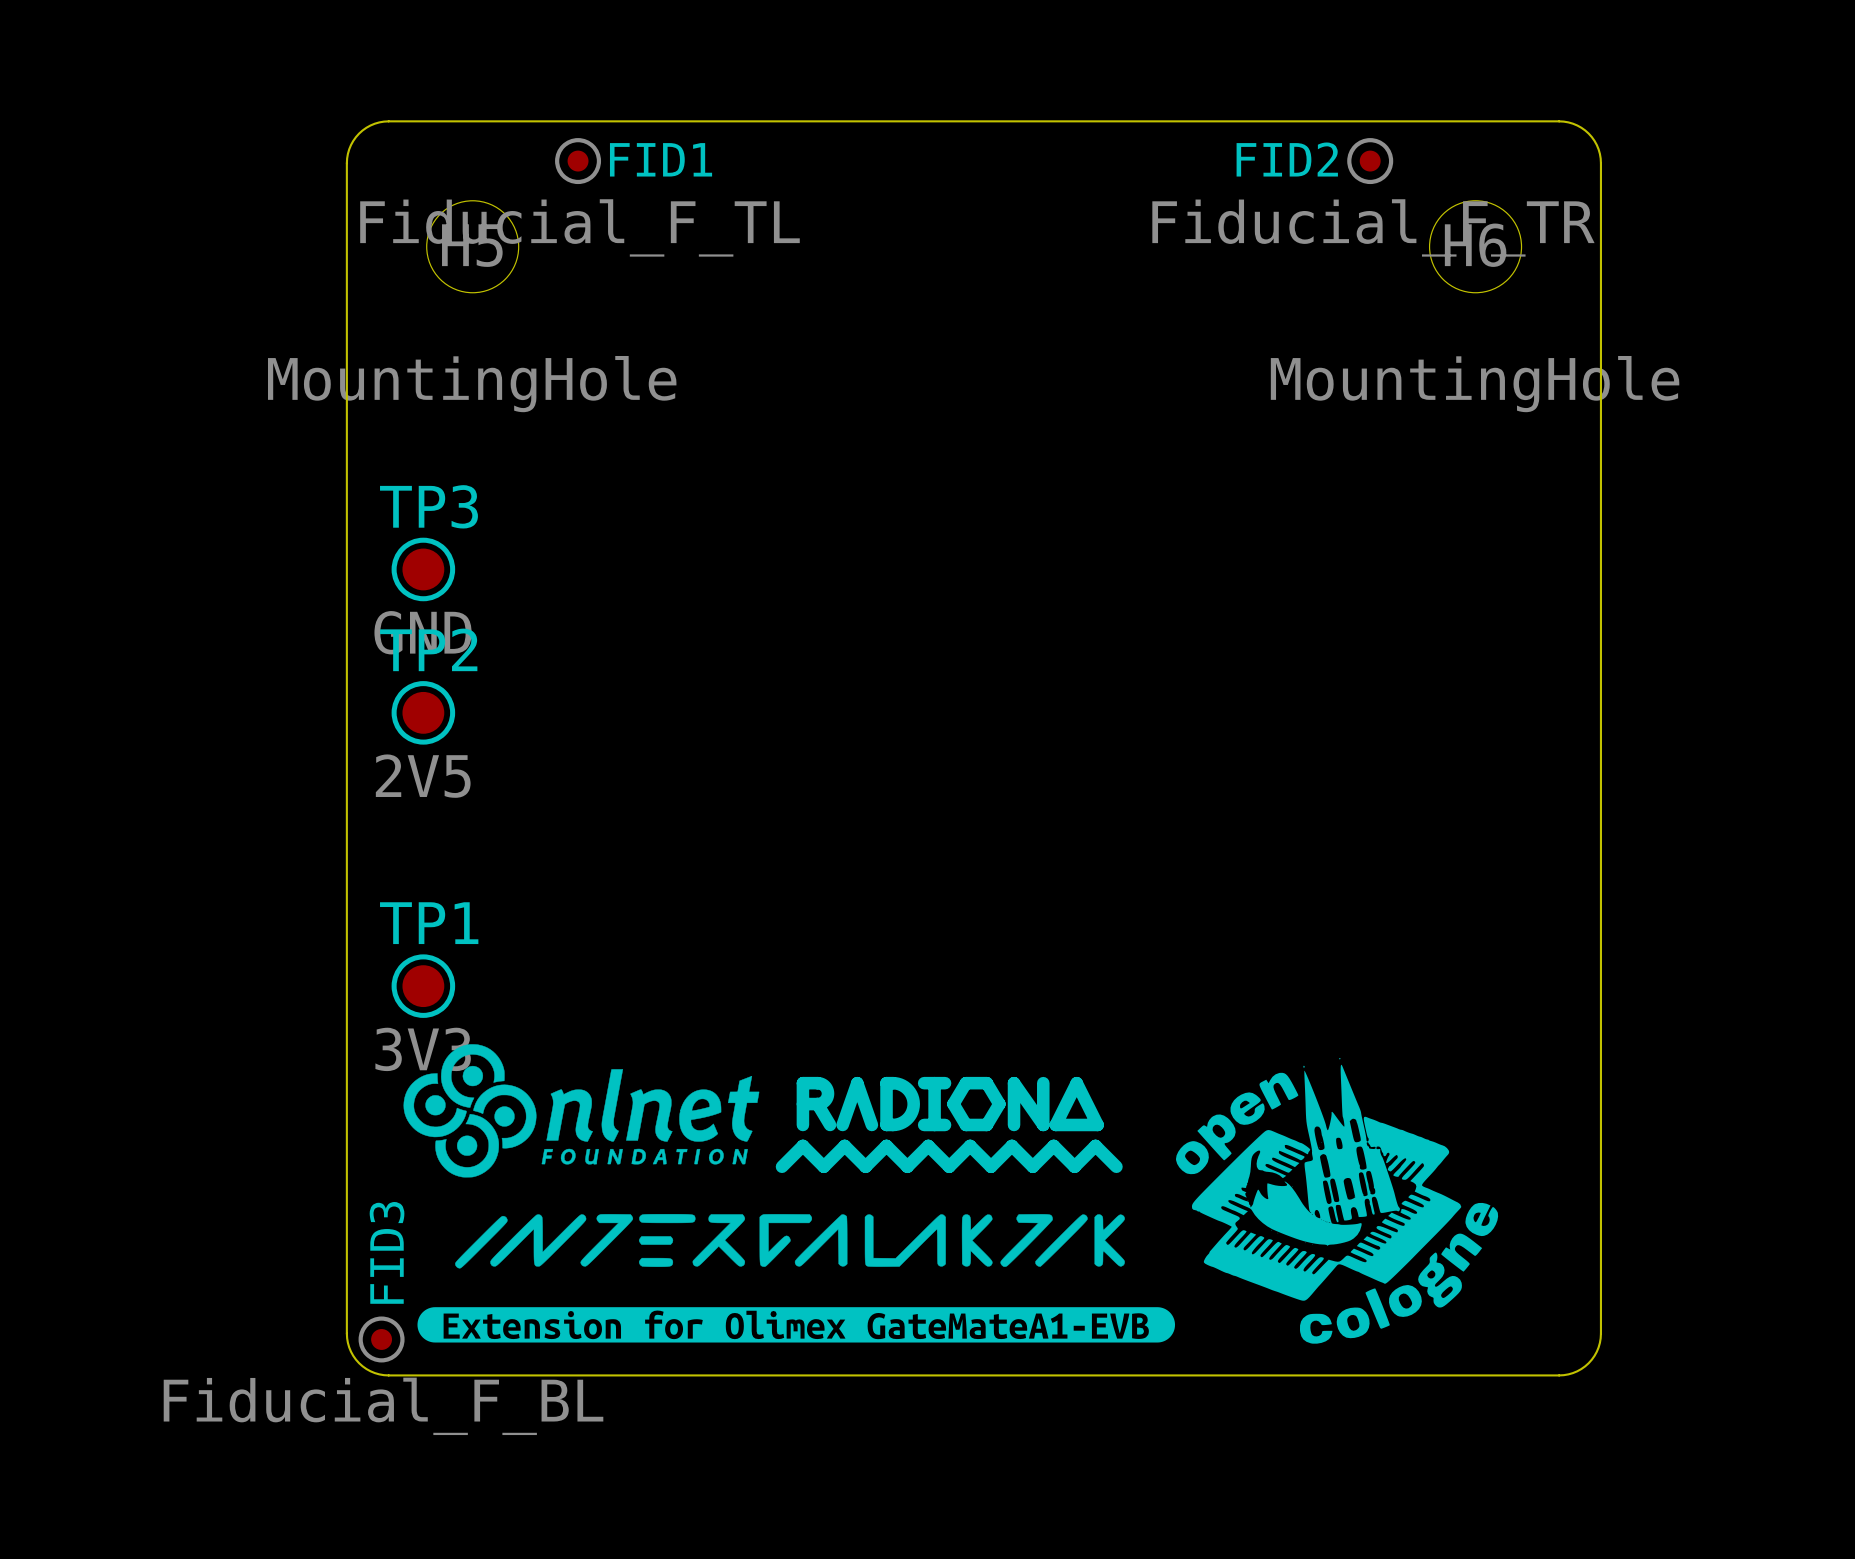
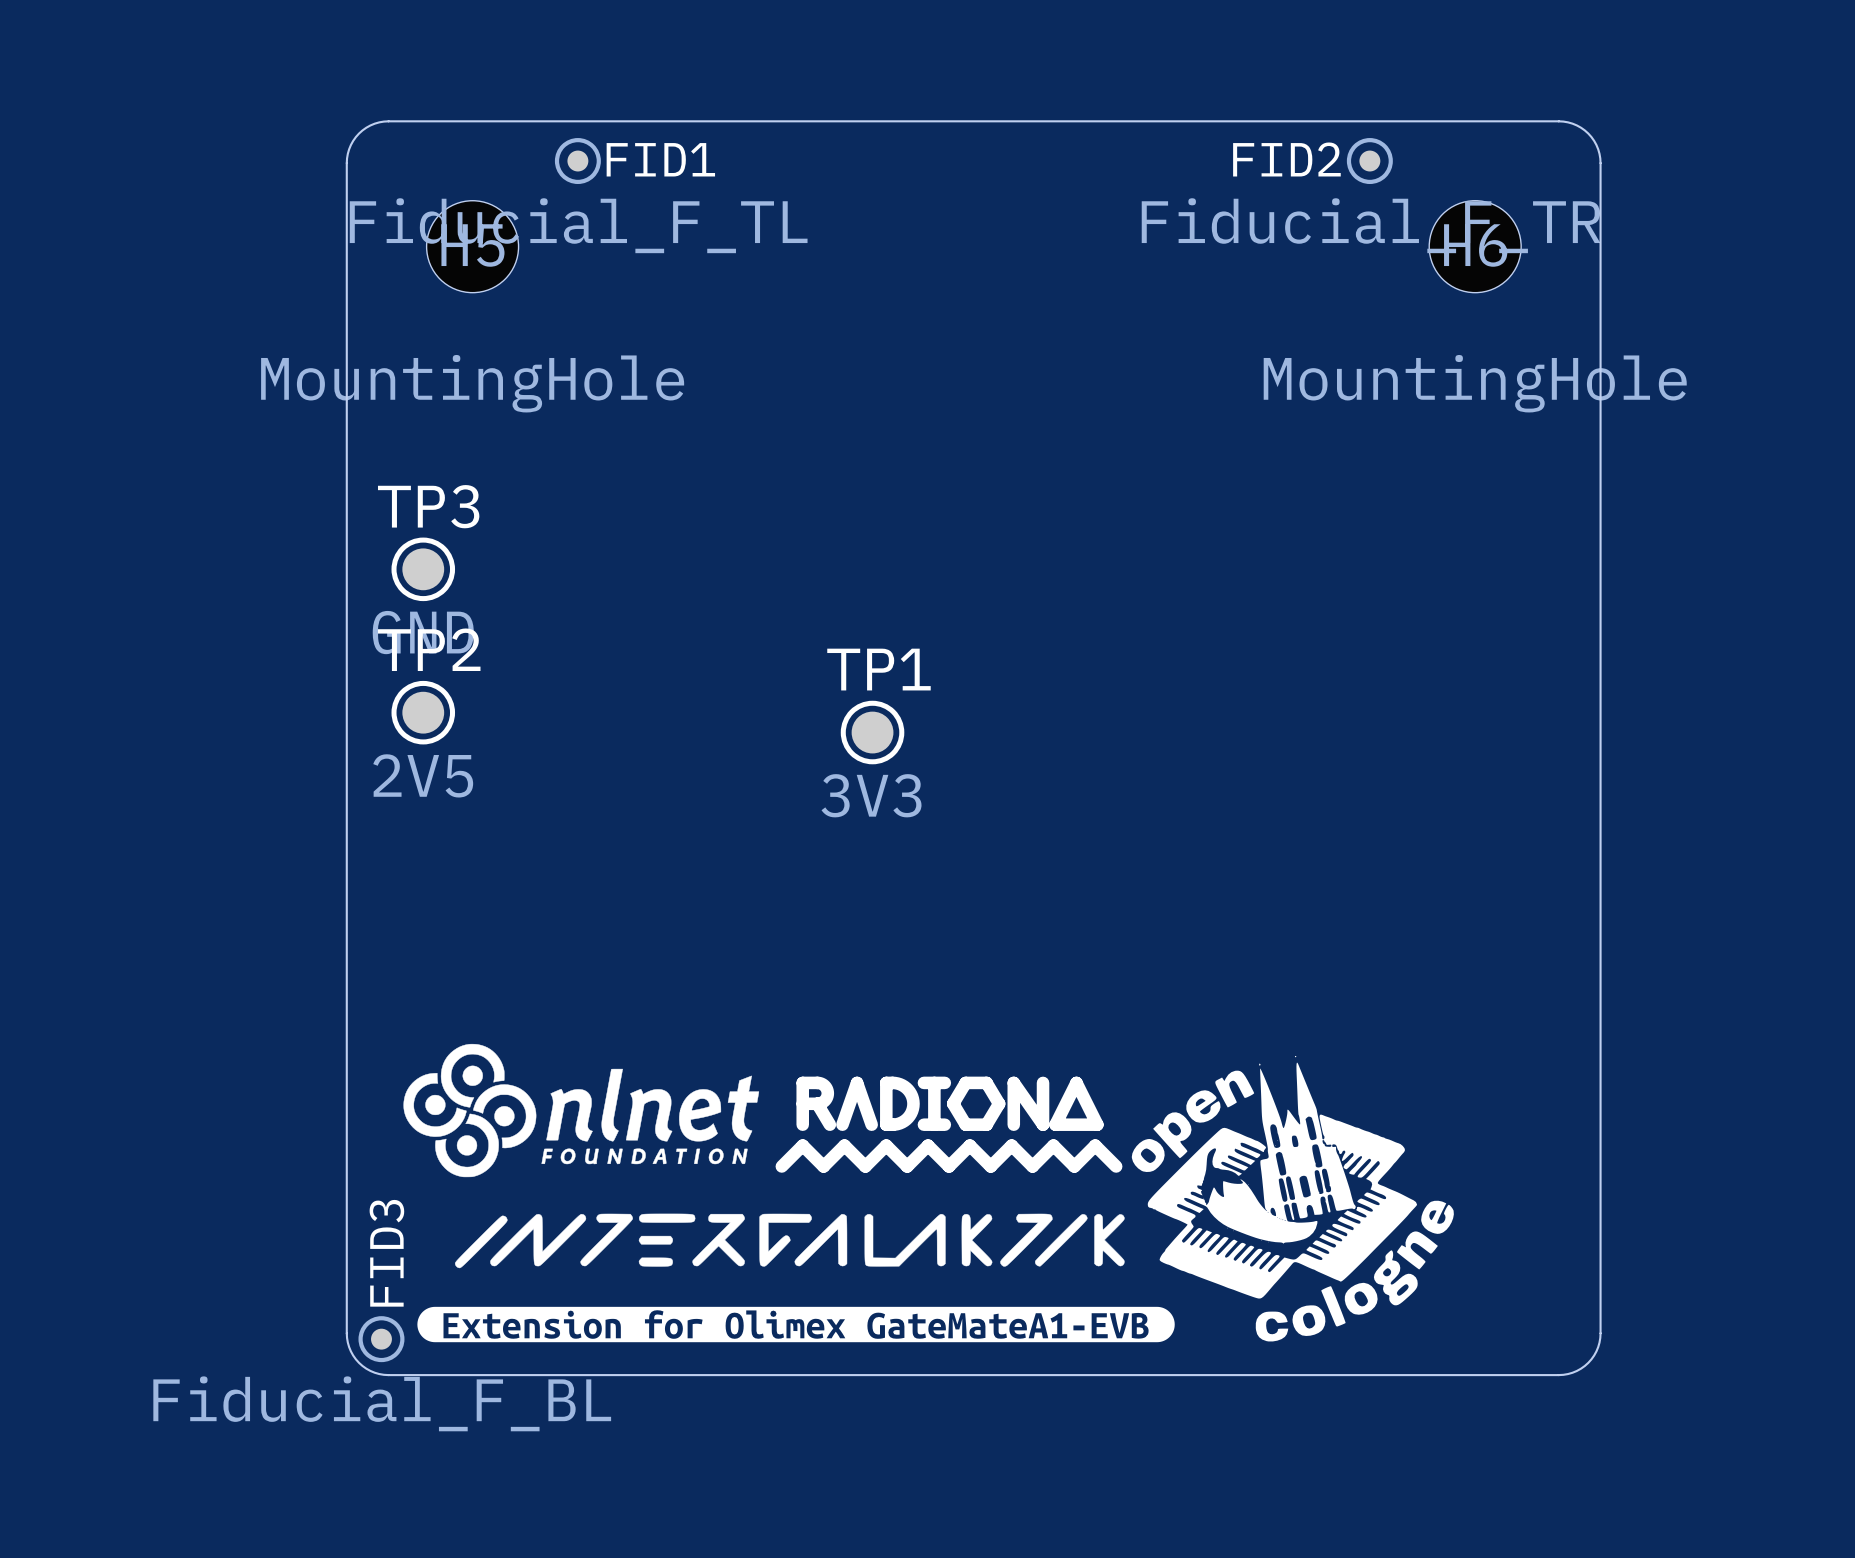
TP1 position: (423, 986) -> (872, 732)
drawing position: (1337, 1200) -> (1292, 1198)

